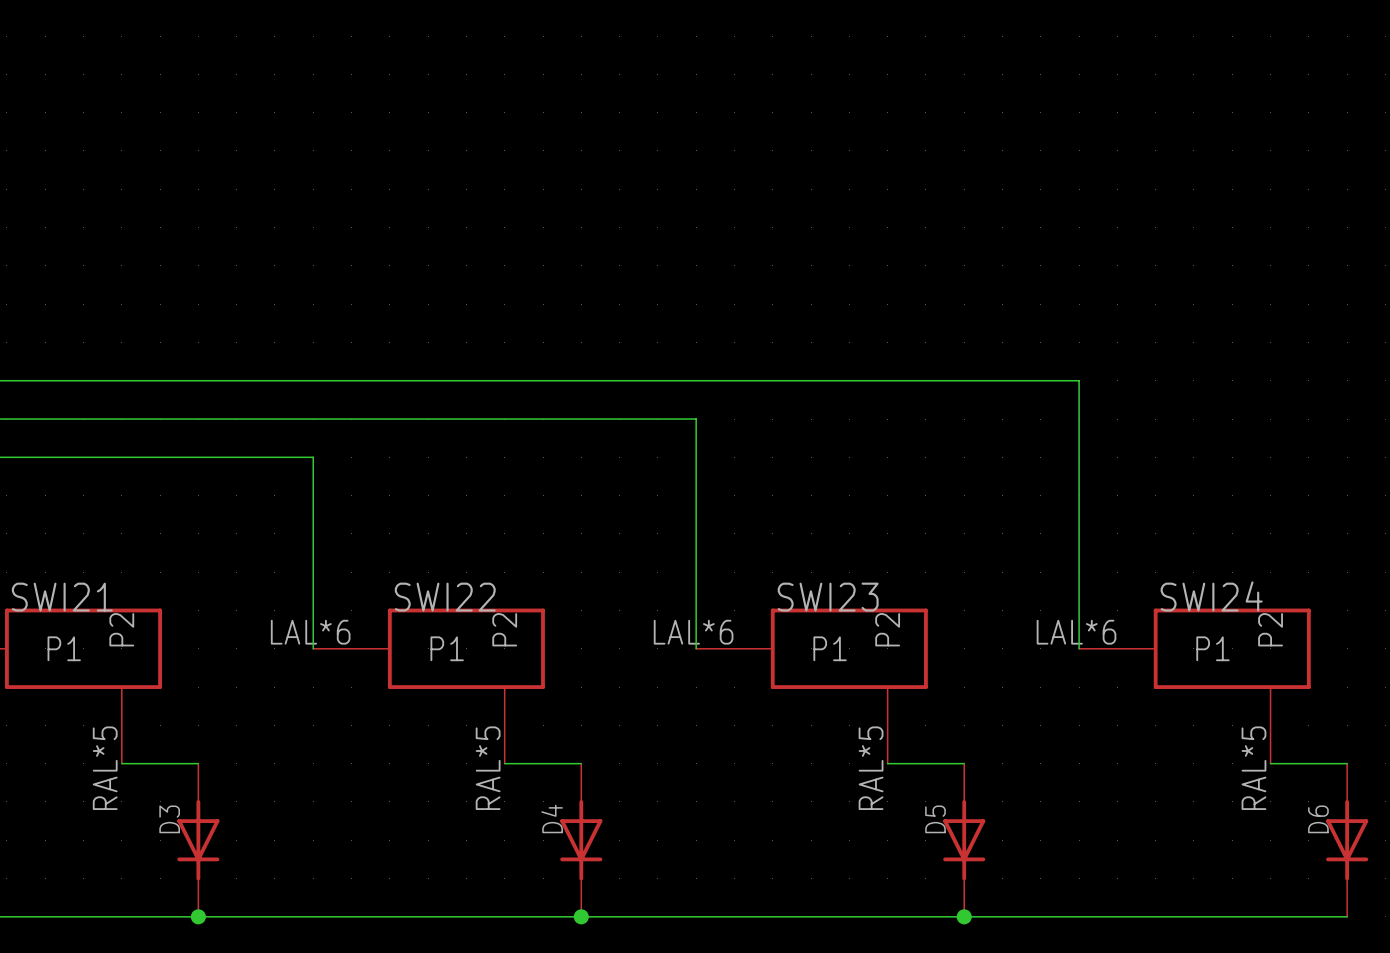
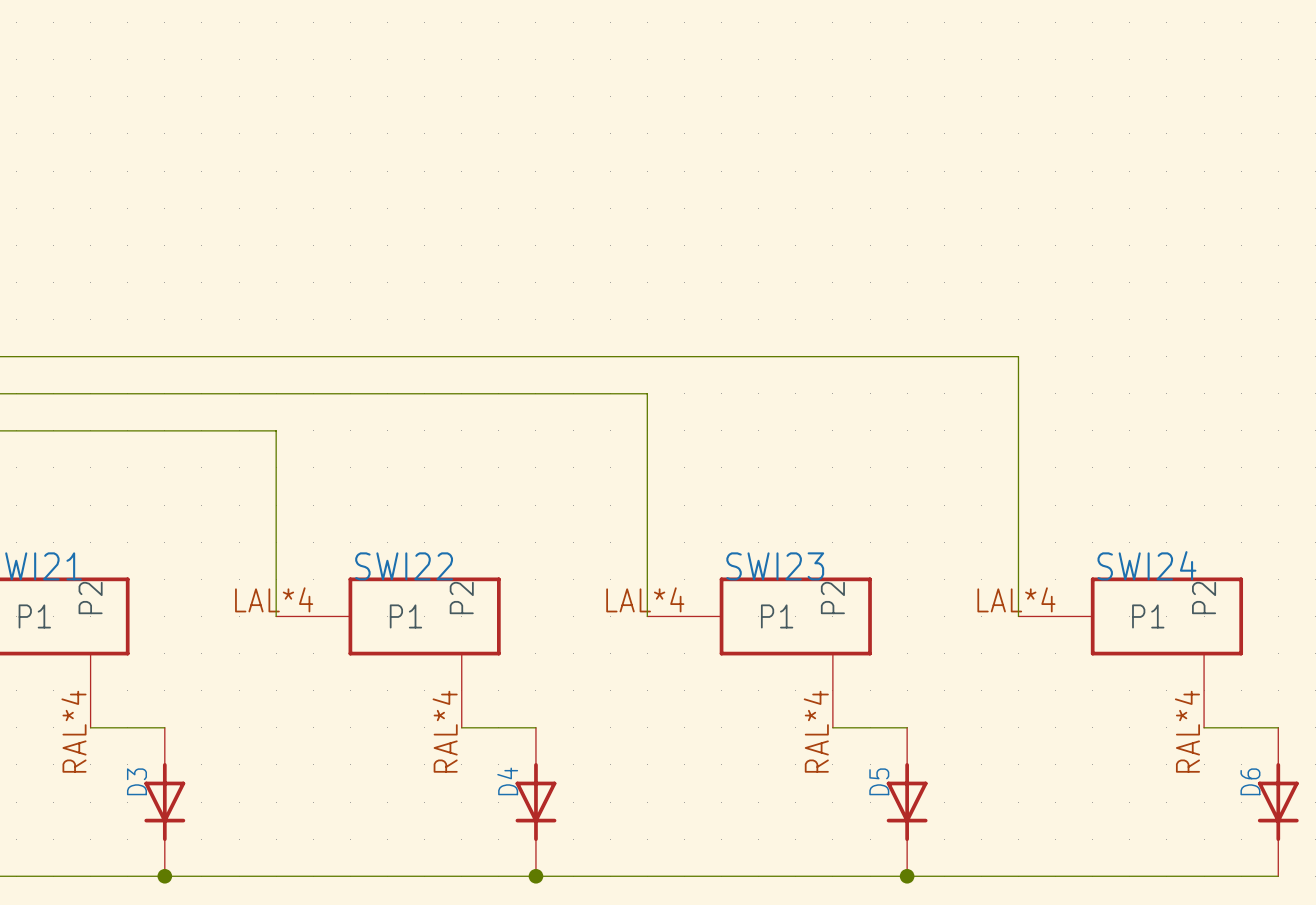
SWI22 pin number: LAL*6 (310, 632) -> LAL*4 (274, 599)
SWI23 pin number: LAL*6 (693, 632) -> LAL*4 (645, 599)
SWI24 pin number: LAL*6 (1076, 632) -> LAL*4 (1016, 599)
SWI21 pin number: RAL*5 (105, 768) -> RAL*4 (73, 731)
SWI22 pin number: RAL*5 (488, 768) -> RAL*4 (445, 731)
SWI23 pin number: RAL*5 (871, 768) -> RAL*4 (816, 731)
SWI24 pin number: RAL*5 (1253, 768) -> RAL*4 (1187, 731)

